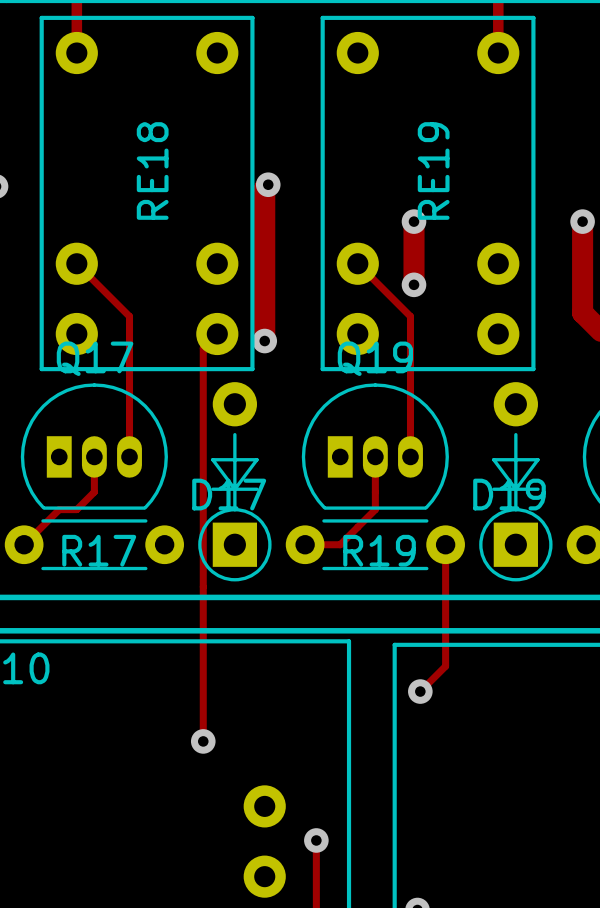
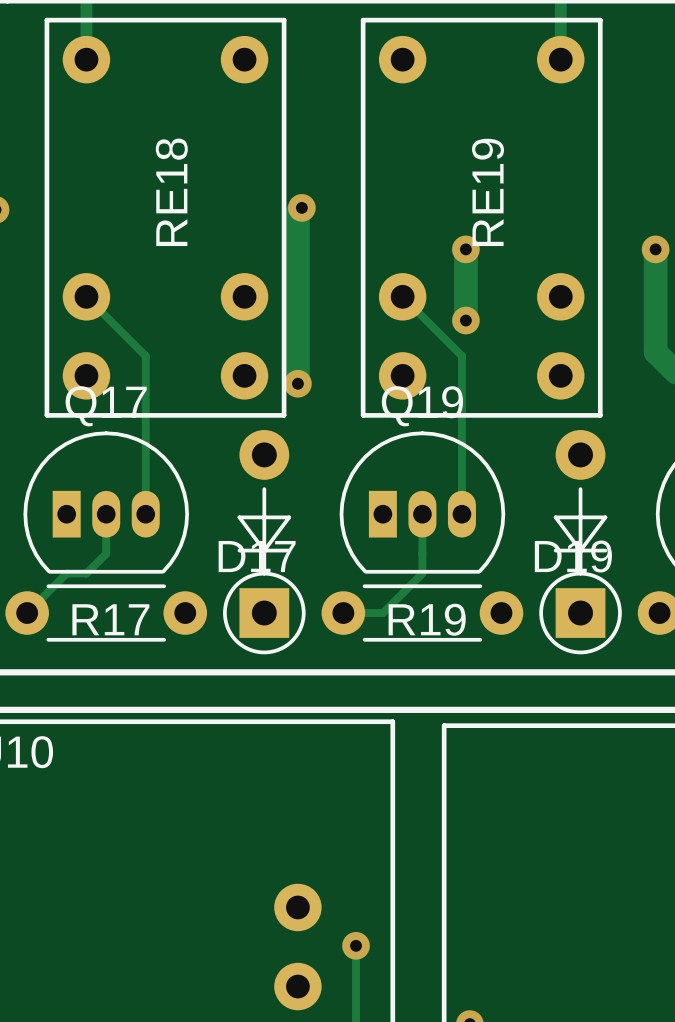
track: (217, 334) (203, 348) (203, 741) -> none
track: (445, 544) (445, 666) (420, 691) -> none
via: (420, 691) -> none
via: (203, 741) -> none

